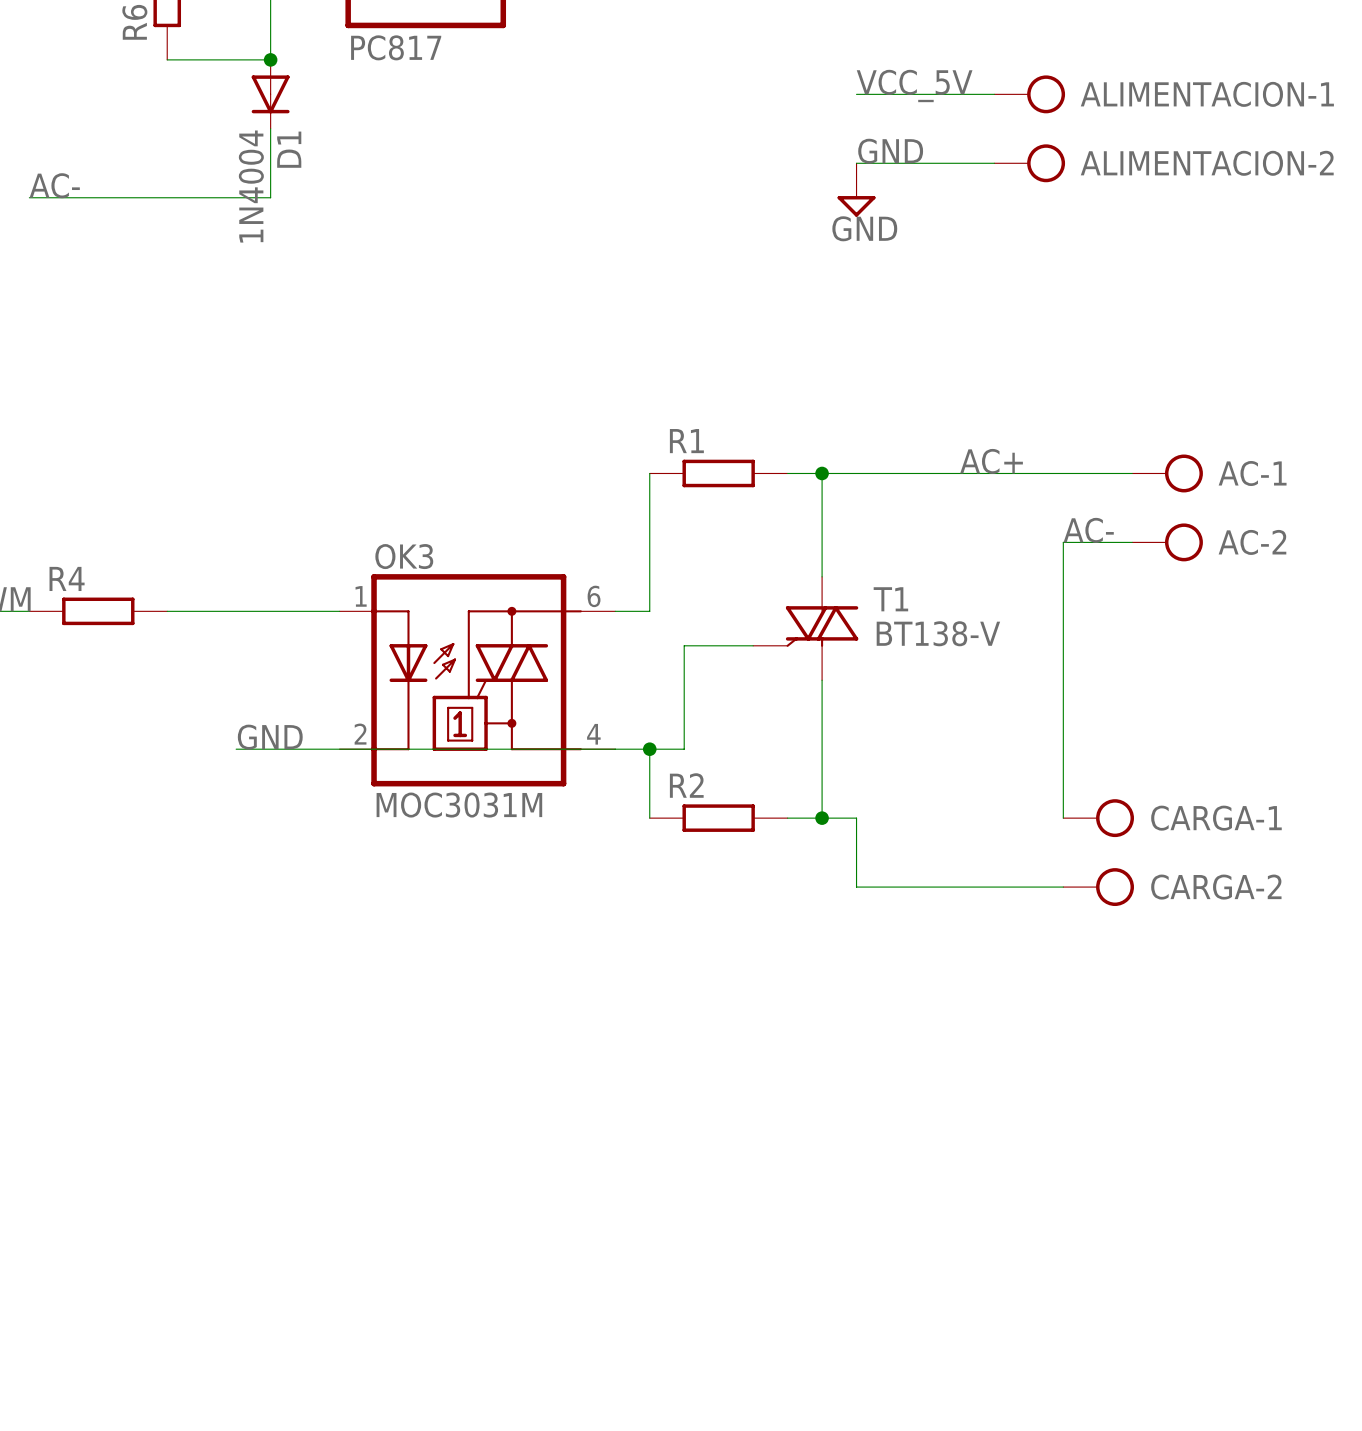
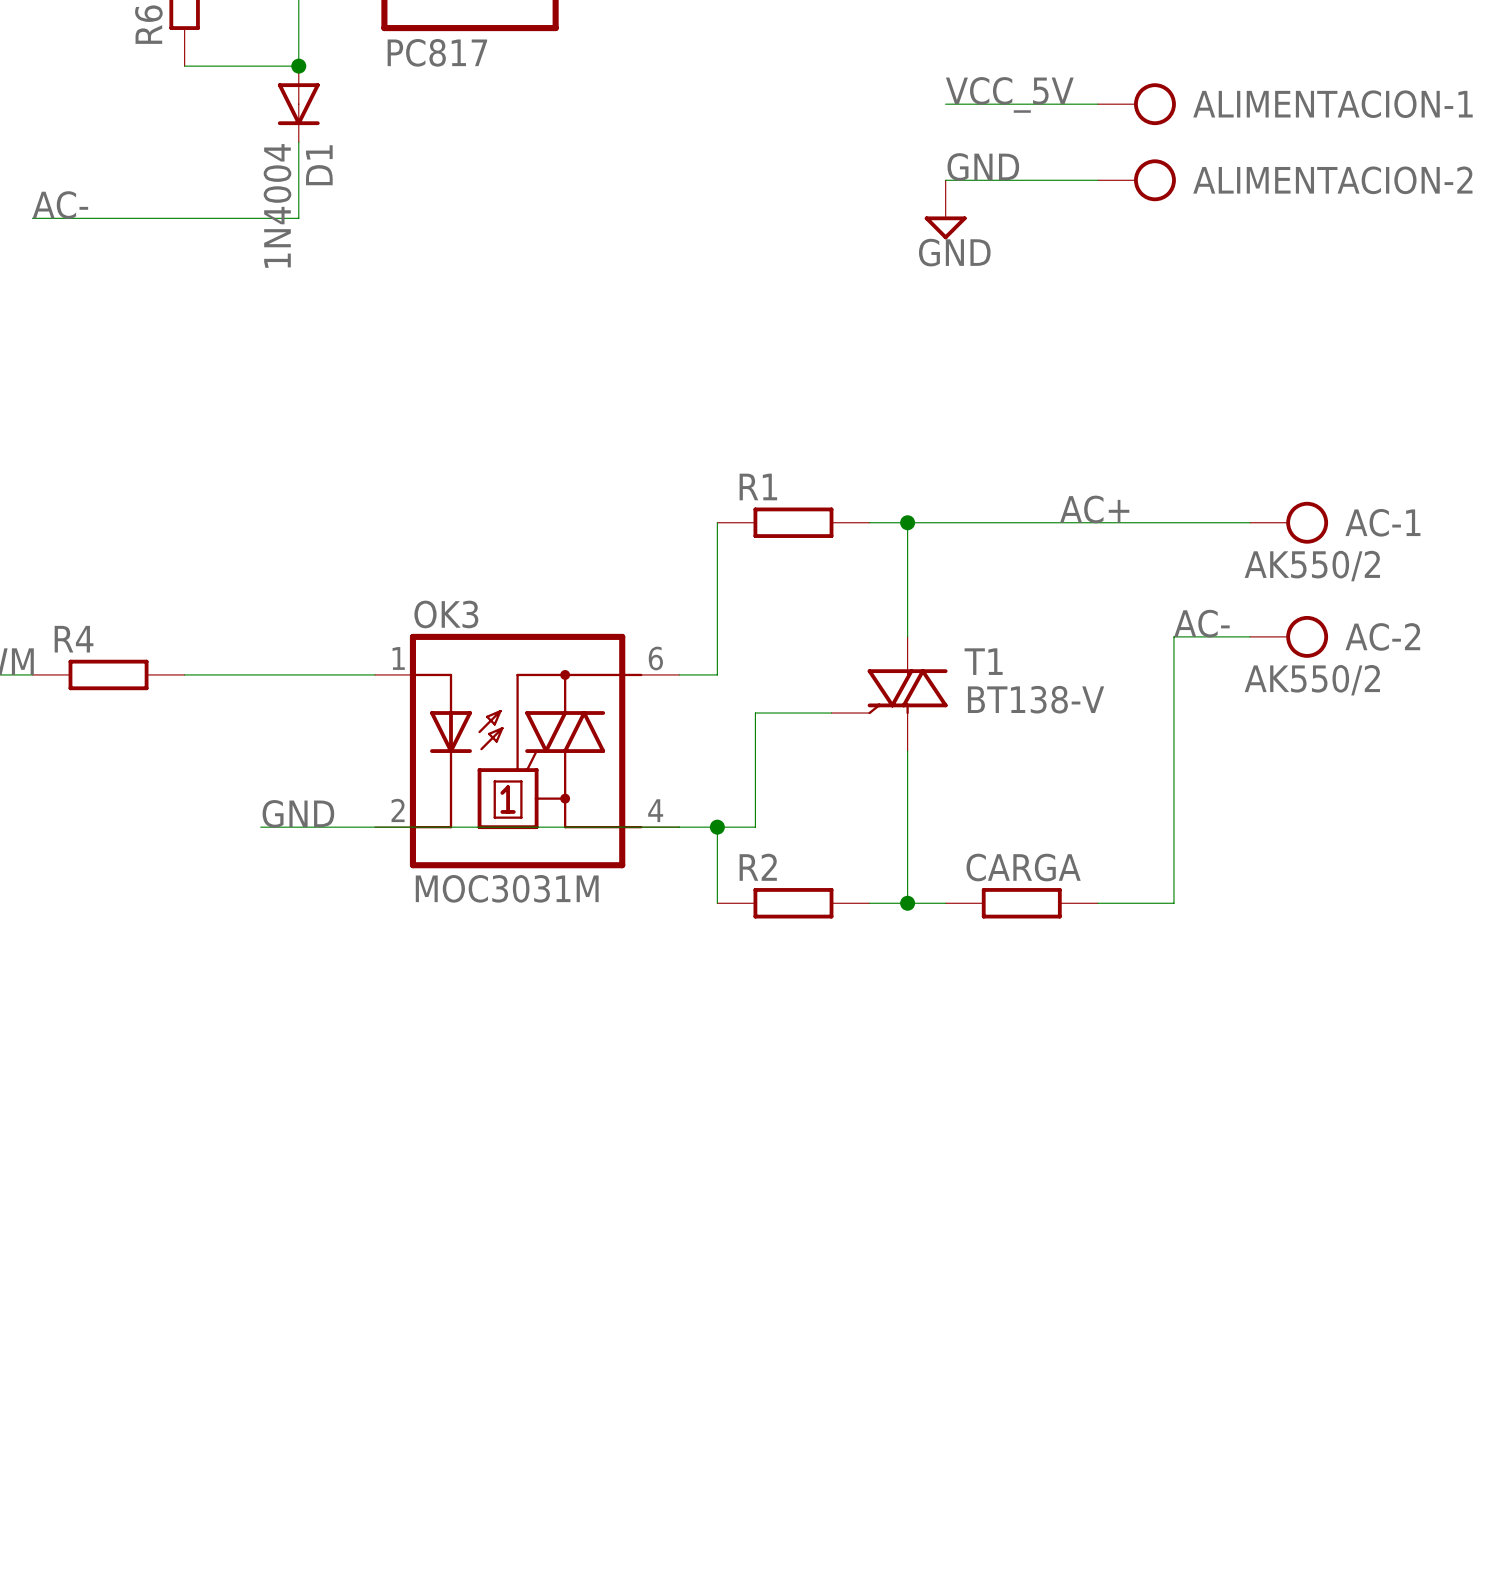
AC-1 value: none -> AK550/2 (1312, 566)
label position: AC- (1088, 530) -> AC- (1201, 623)
wire: (1132, 542) (1063, 542) (1063, 576) -> (1250, 636) (1173, 636)
AC-2 position: (1167, 542) -> (1289, 636)
AC-2 value: none -> AK550/2 (1312, 680)
wire: (856, 818) (856, 887) (1063, 887) -> none
CARGA: none -> (1021, 903)
wire: none -> (1097, 903) (1173, 903)
CARGA-1: (1098, 818) -> none
CARGA-2: (1098, 887) -> none

